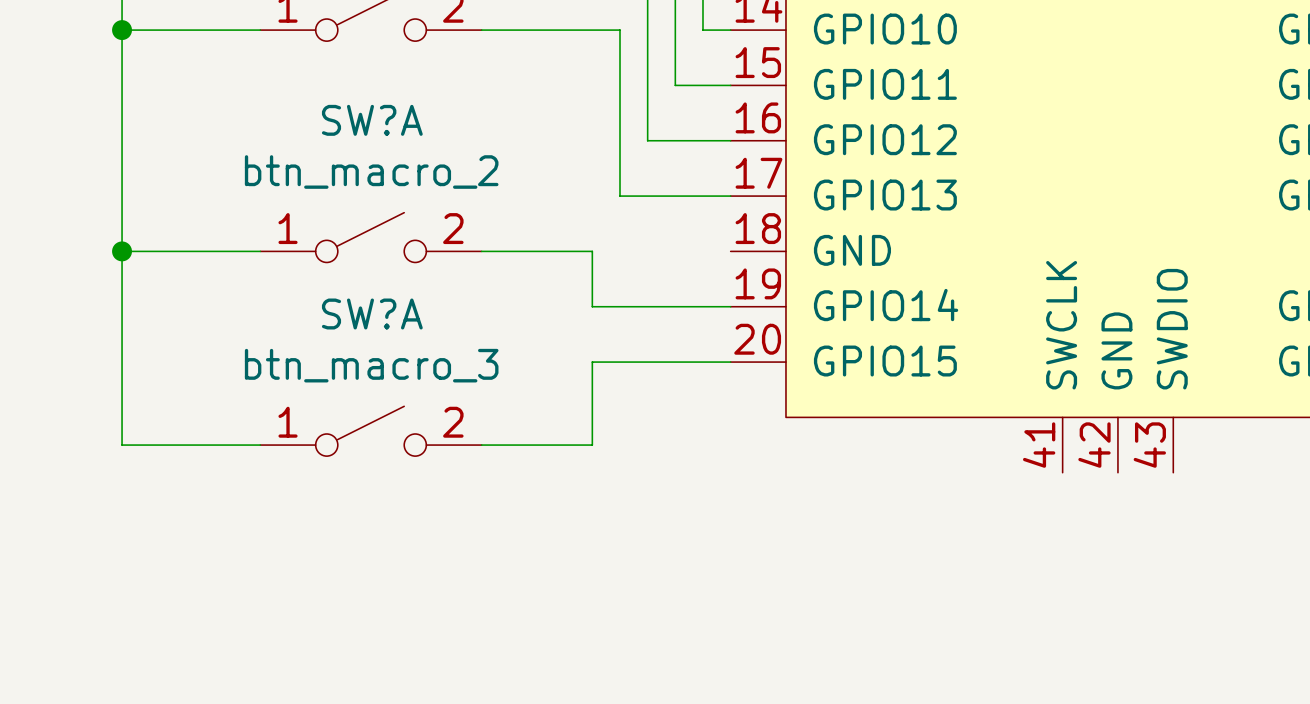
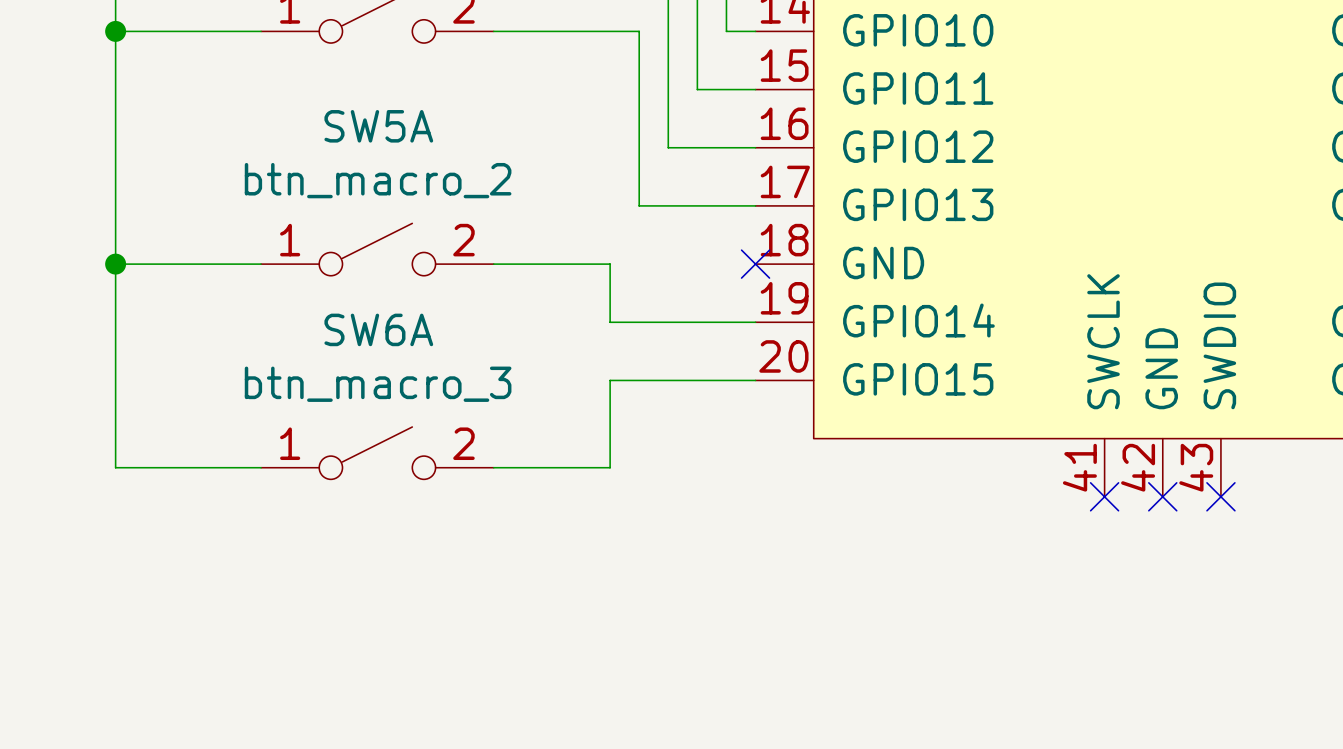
SW?A name: SW?A (372, 120) -> SW5A (378, 126)
no-connect mark: none -> (755, 264)
SW?A name: SW?A (372, 313) -> SW6A (378, 329)
no-connect mark: none -> (1104, 496)
no-connect mark: none -> (1162, 496)
no-connect mark: none -> (1220, 496)

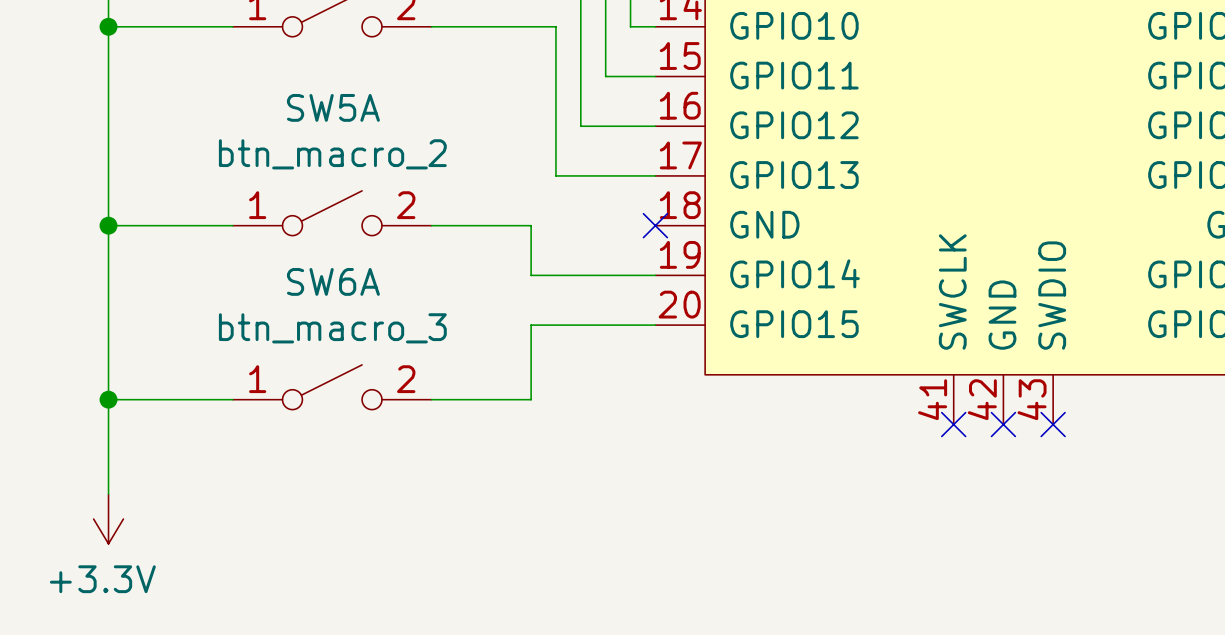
wire: none -> (108, 399) (108, 494)
junction: none -> (108, 399)
power symbol: none -> +3.3V (108, 518)

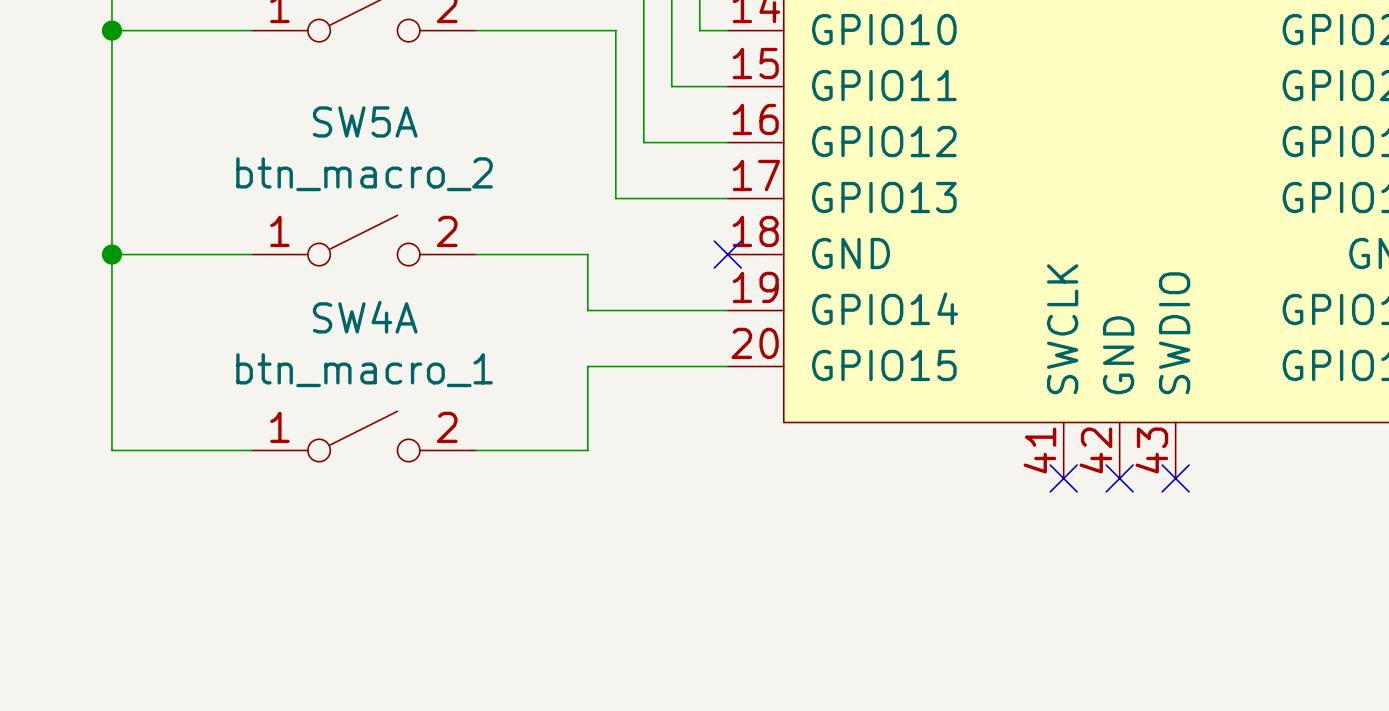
SW6A name: SW6A (333, 281) -> SW4A (365, 317)
SW6A value: btn_macro_3 (332, 328) -> btn_macro_1 (364, 370)
wire: (108, 399) (108, 494) -> none
junction: (108, 399) -> none
power symbol: +3.3V (108, 518) -> none

